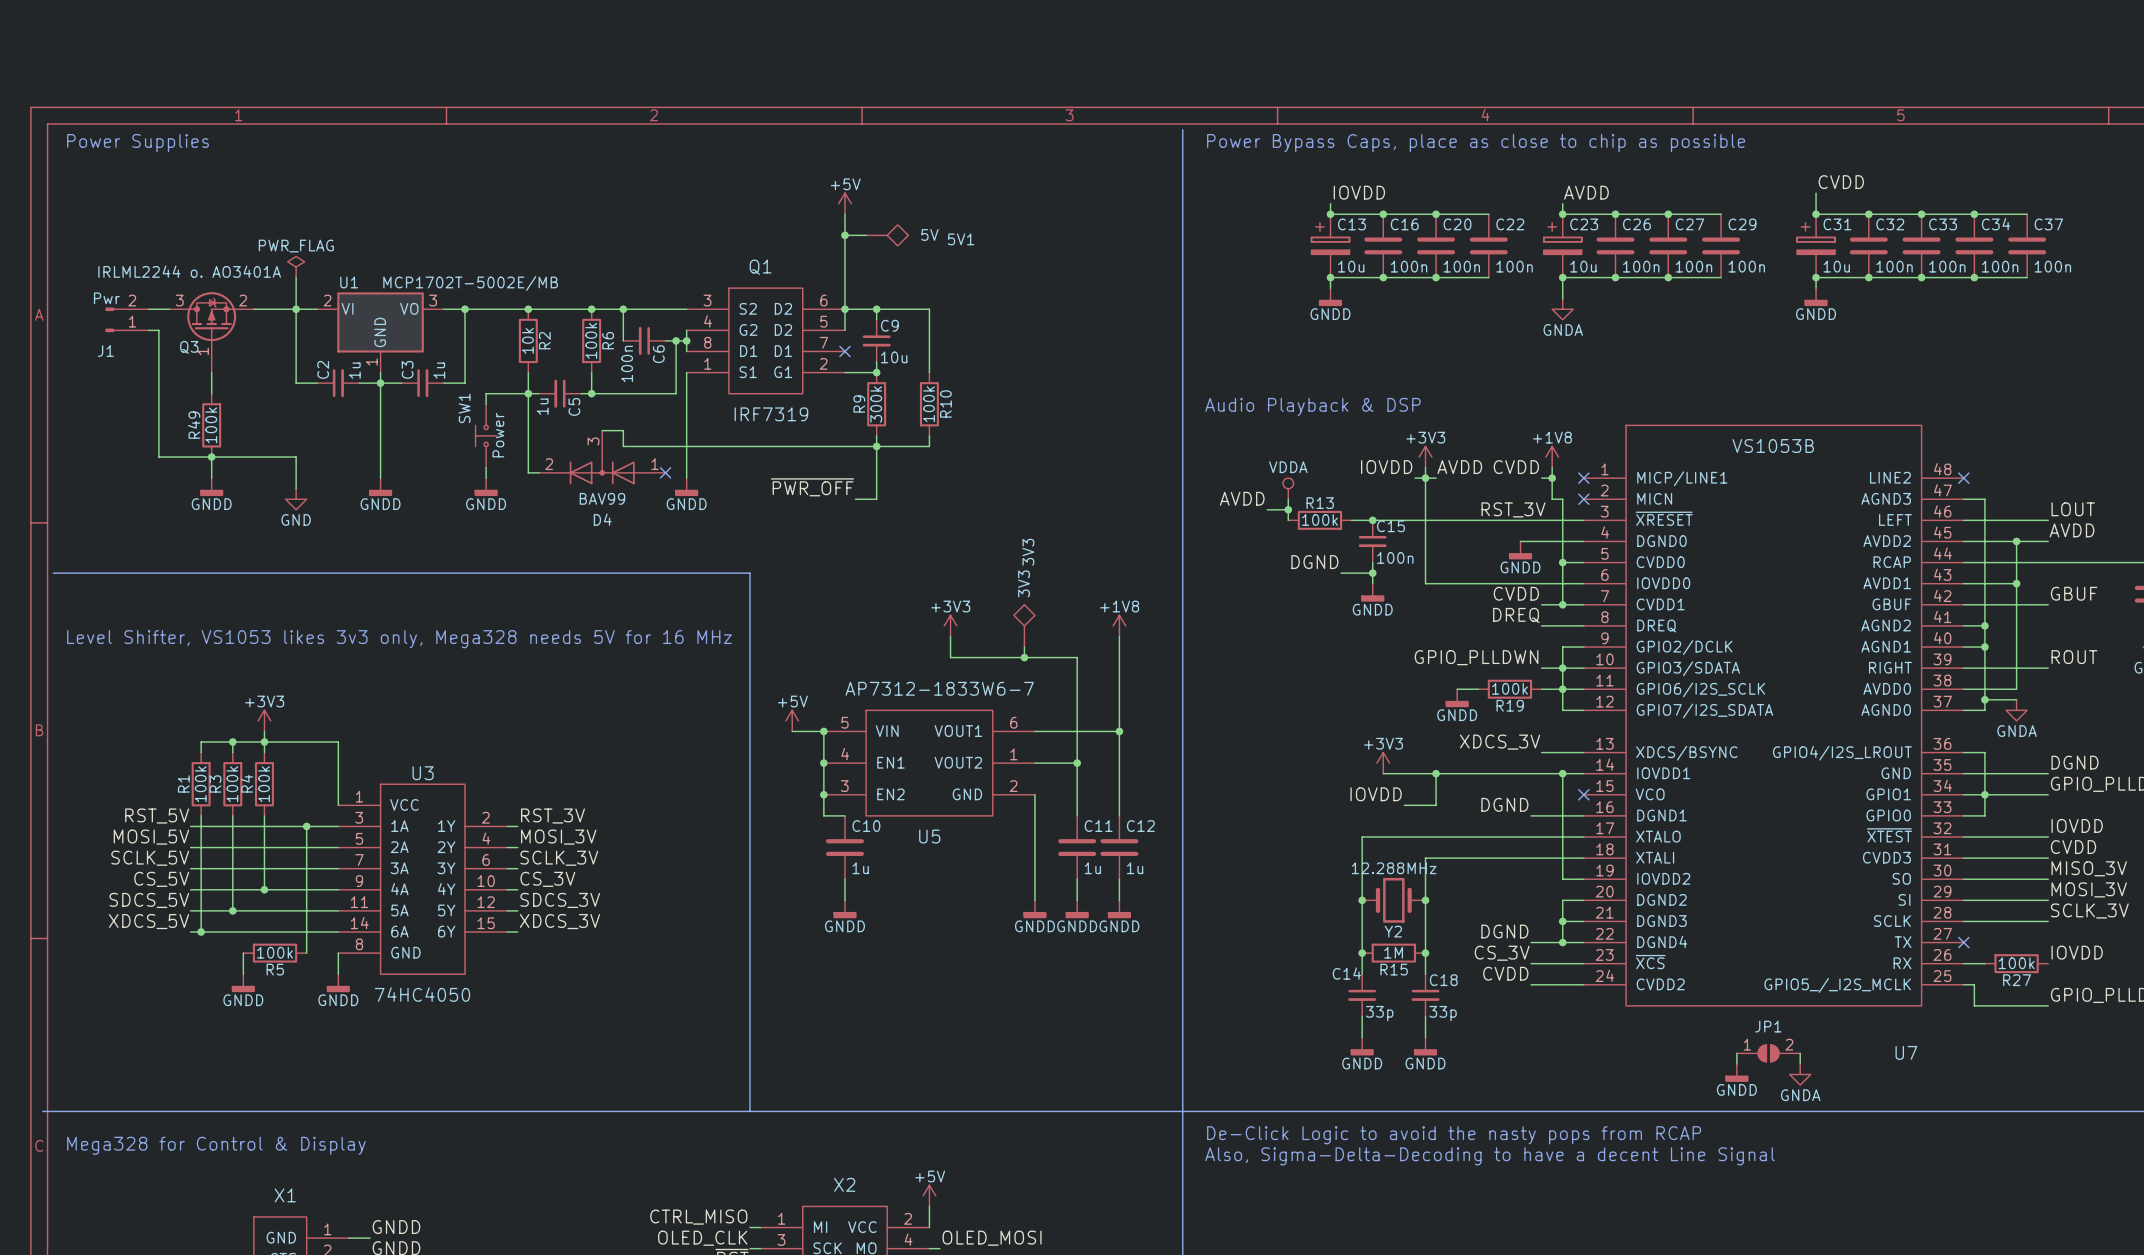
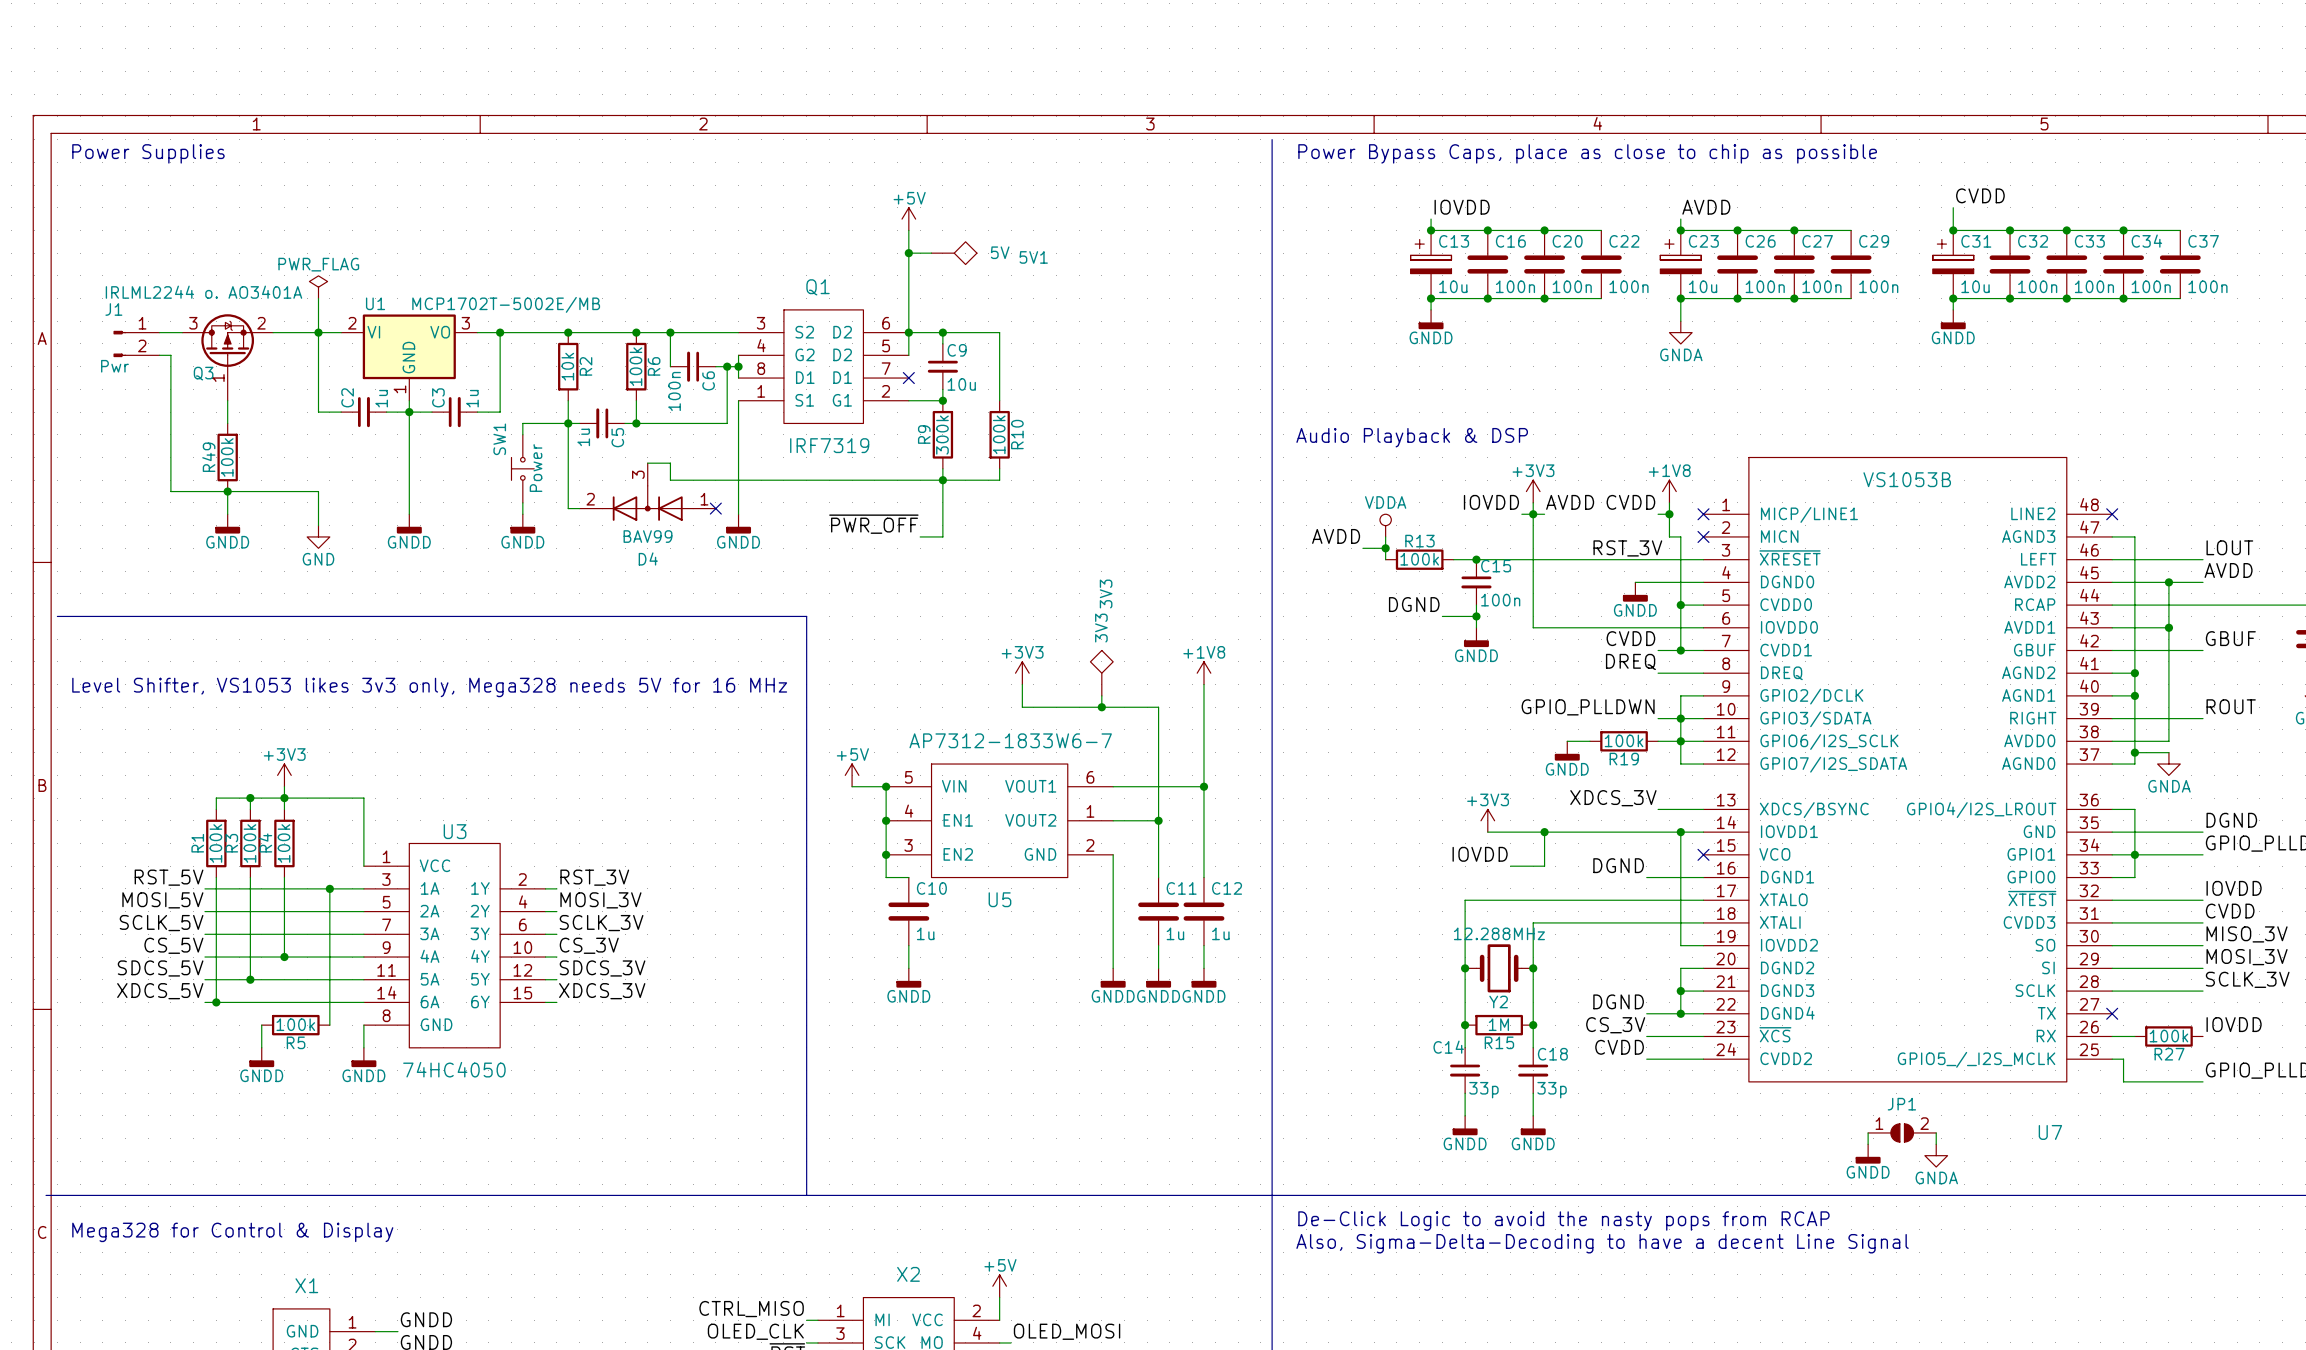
J1 flip: as is (111, 319) -> up-down (119, 343)

